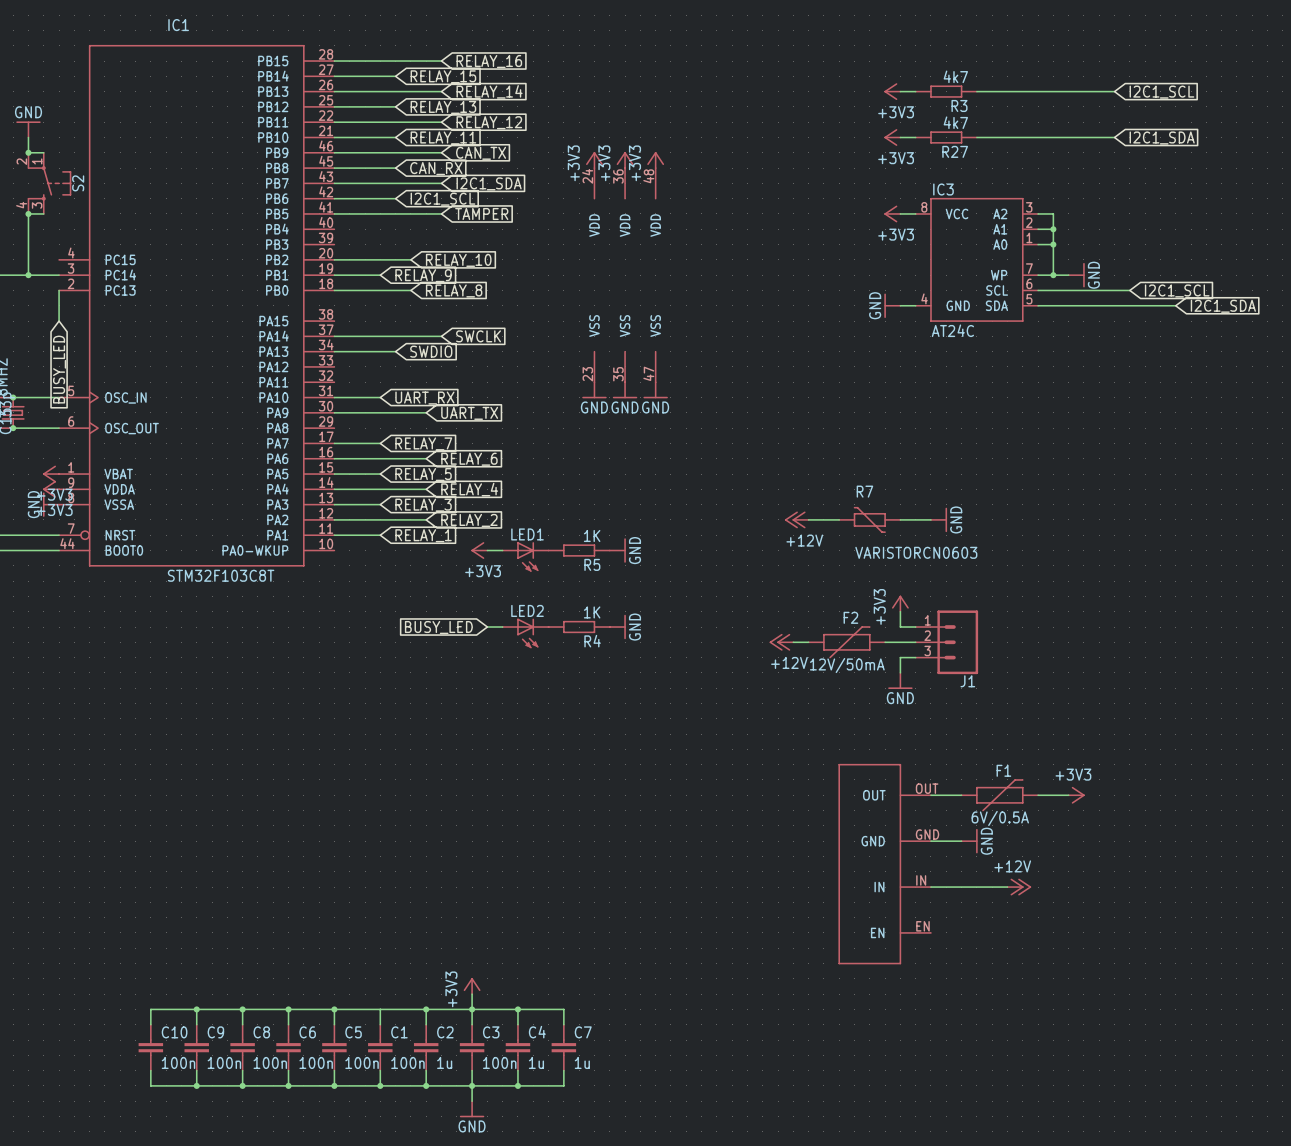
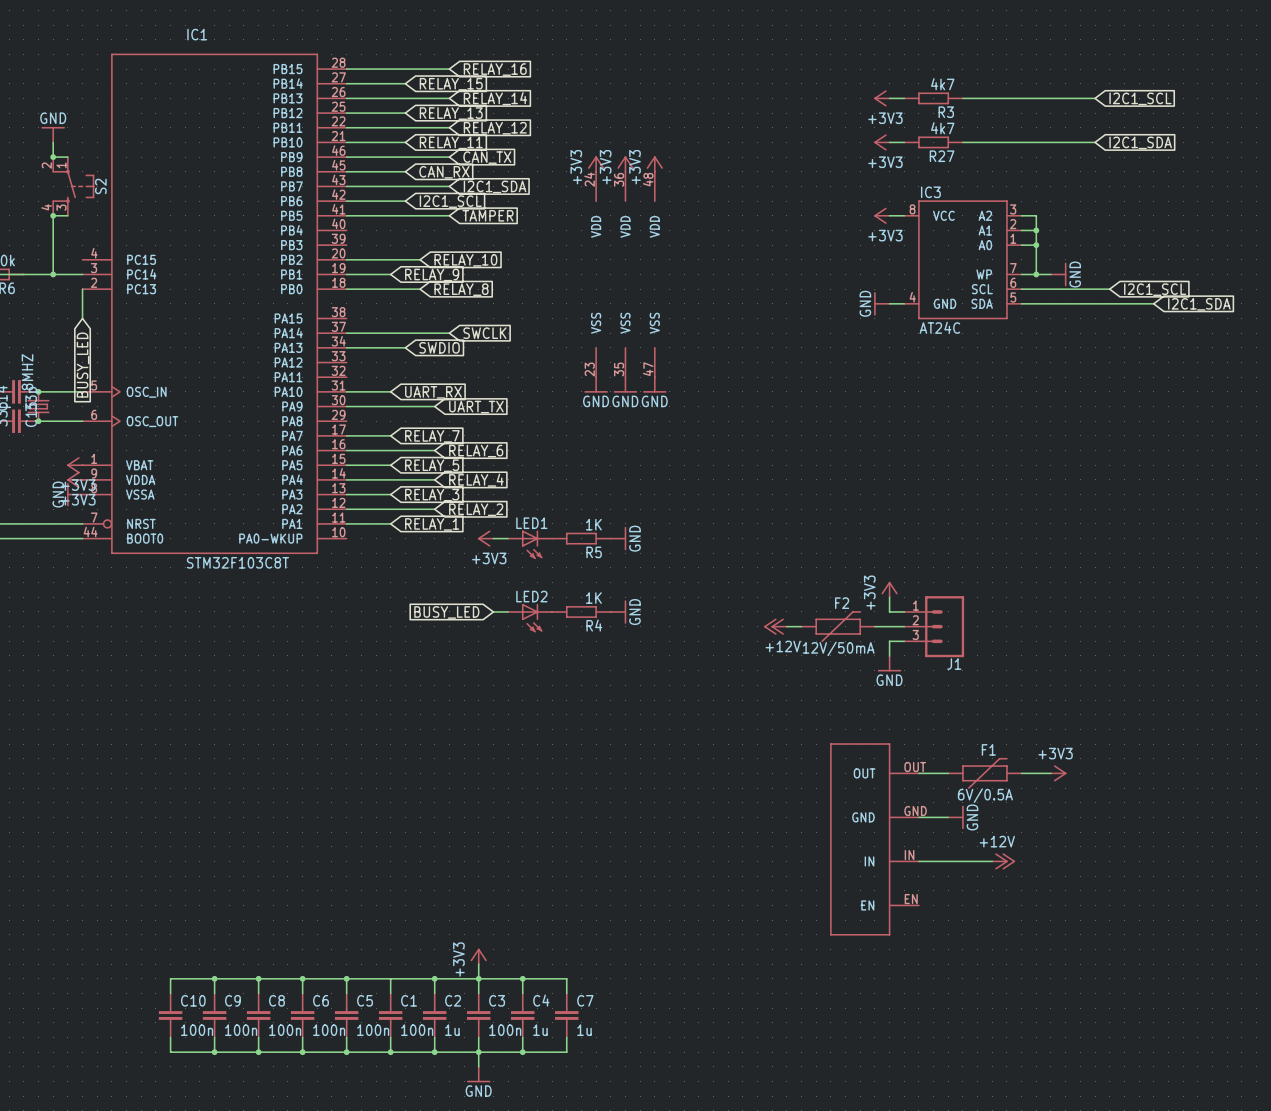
power symbol: +12V (796, 519) -> none
wire: (808, 519) (839, 519) -> none
R7: VARISTORCN0603 (869, 519) -> none
wire: (900, 519) (930, 519) -> none
power symbol: GND (939, 519) -> none

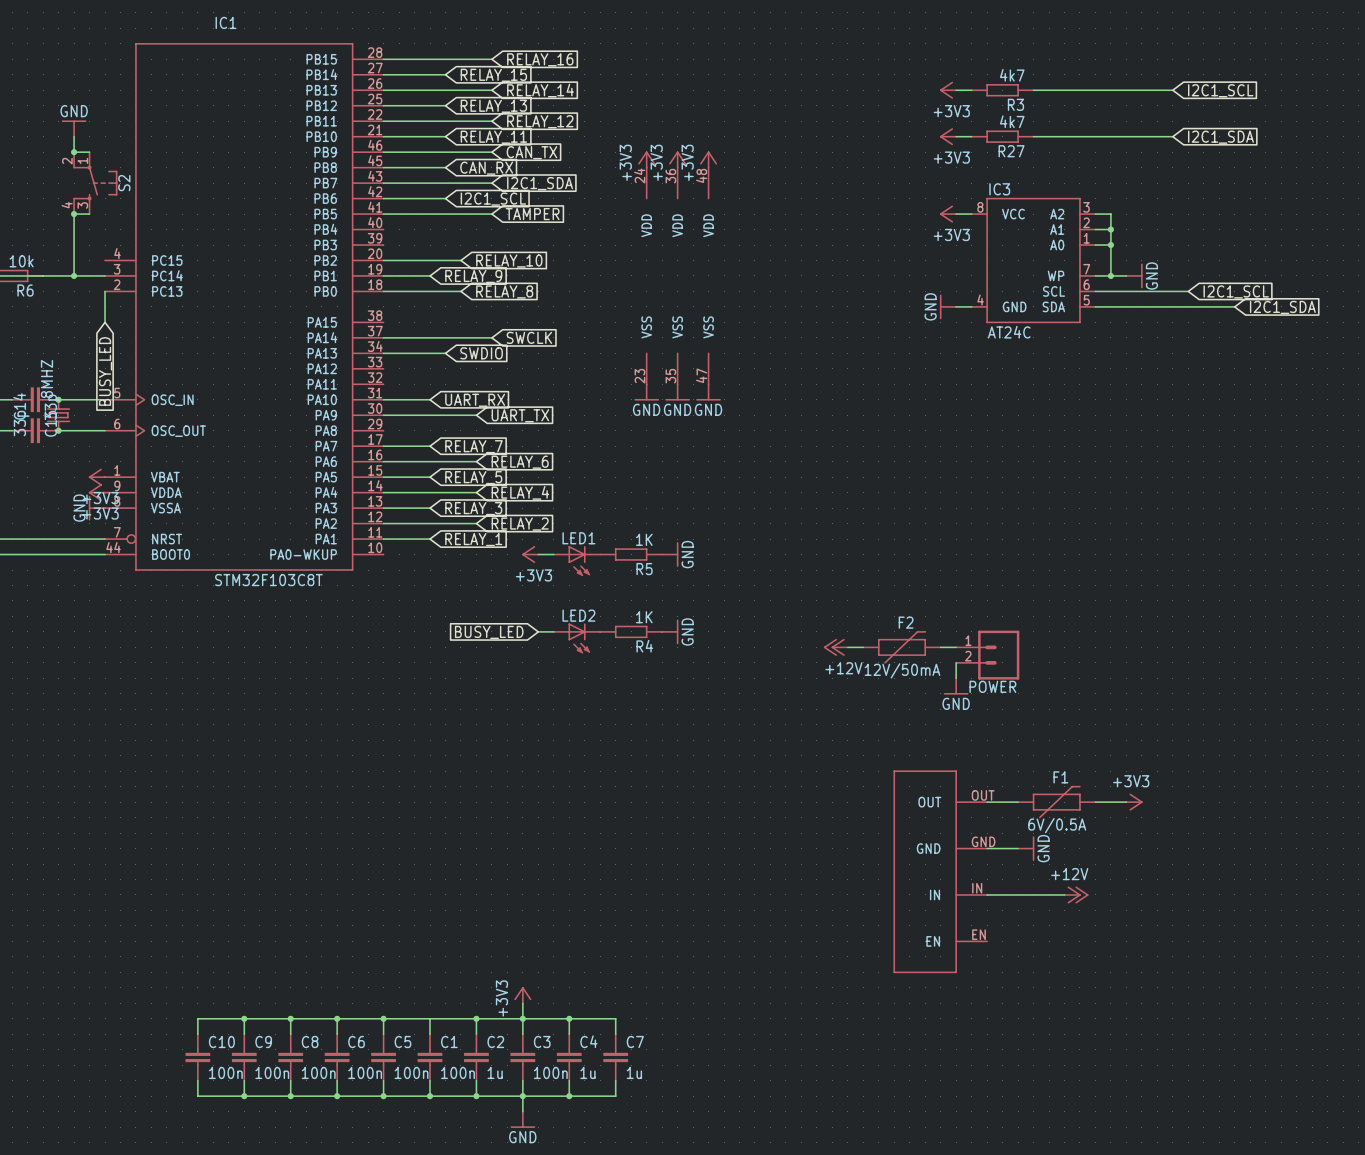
power symbol: +3V3 (889, 589) -> none
wire: (889, 597) (889, 611) (904, 611) -> none
J1: (934, 626) -> none
POWER: none -> (987, 655)

